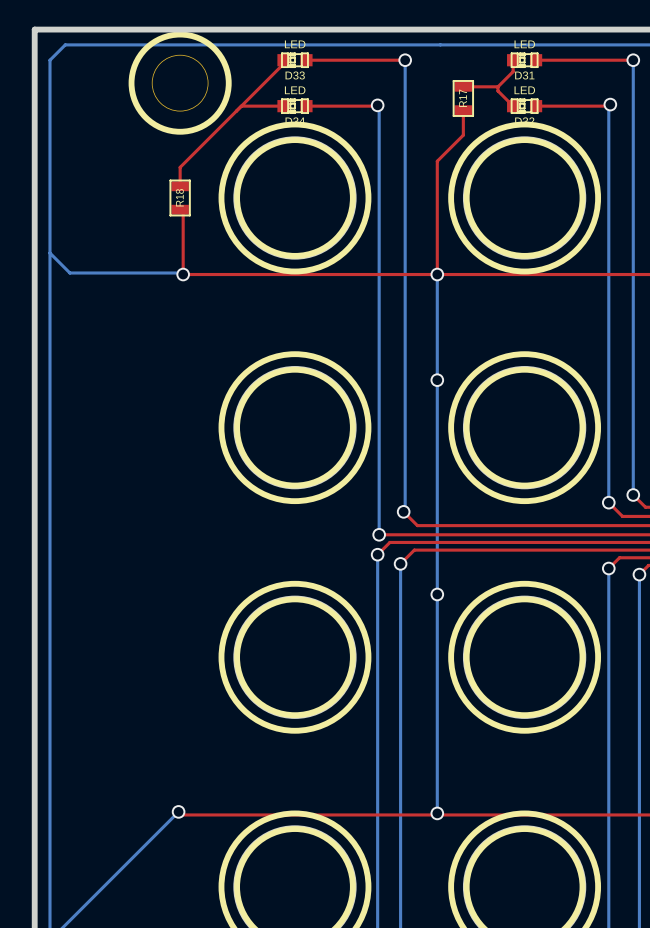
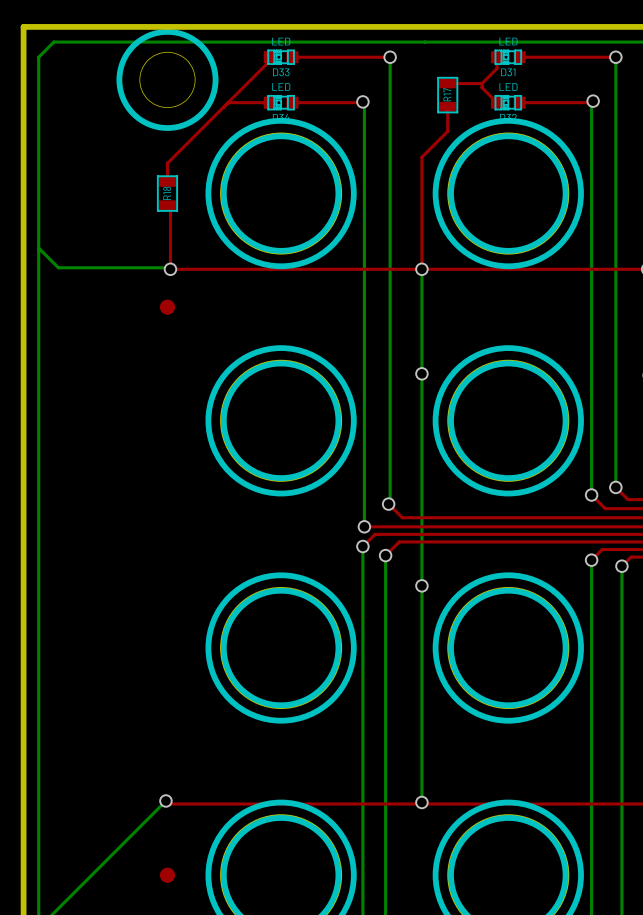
part: none -> (167, 307)
part: none -> (167, 875)

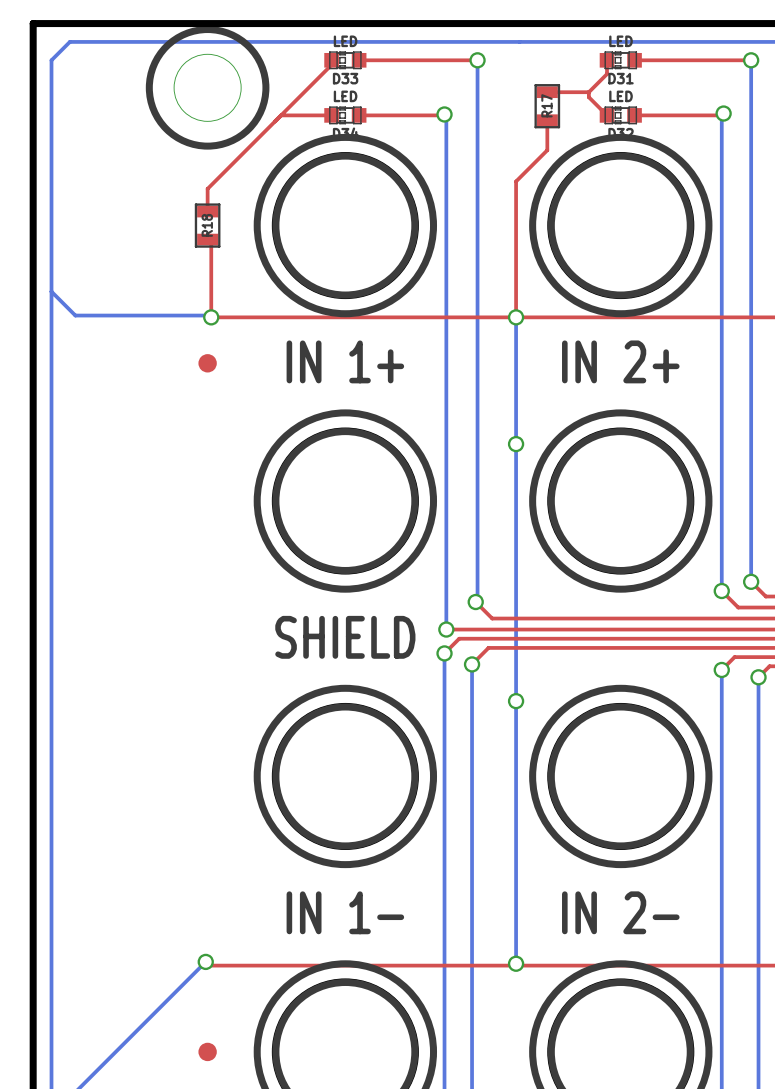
text: none -> IN 2+ (620, 361)
text: none -> IN 1+ (345, 361)
text: none -> SHIELD (345, 637)
text: none -> IN 1- (345, 912)
text: none -> IN 2- (620, 912)

